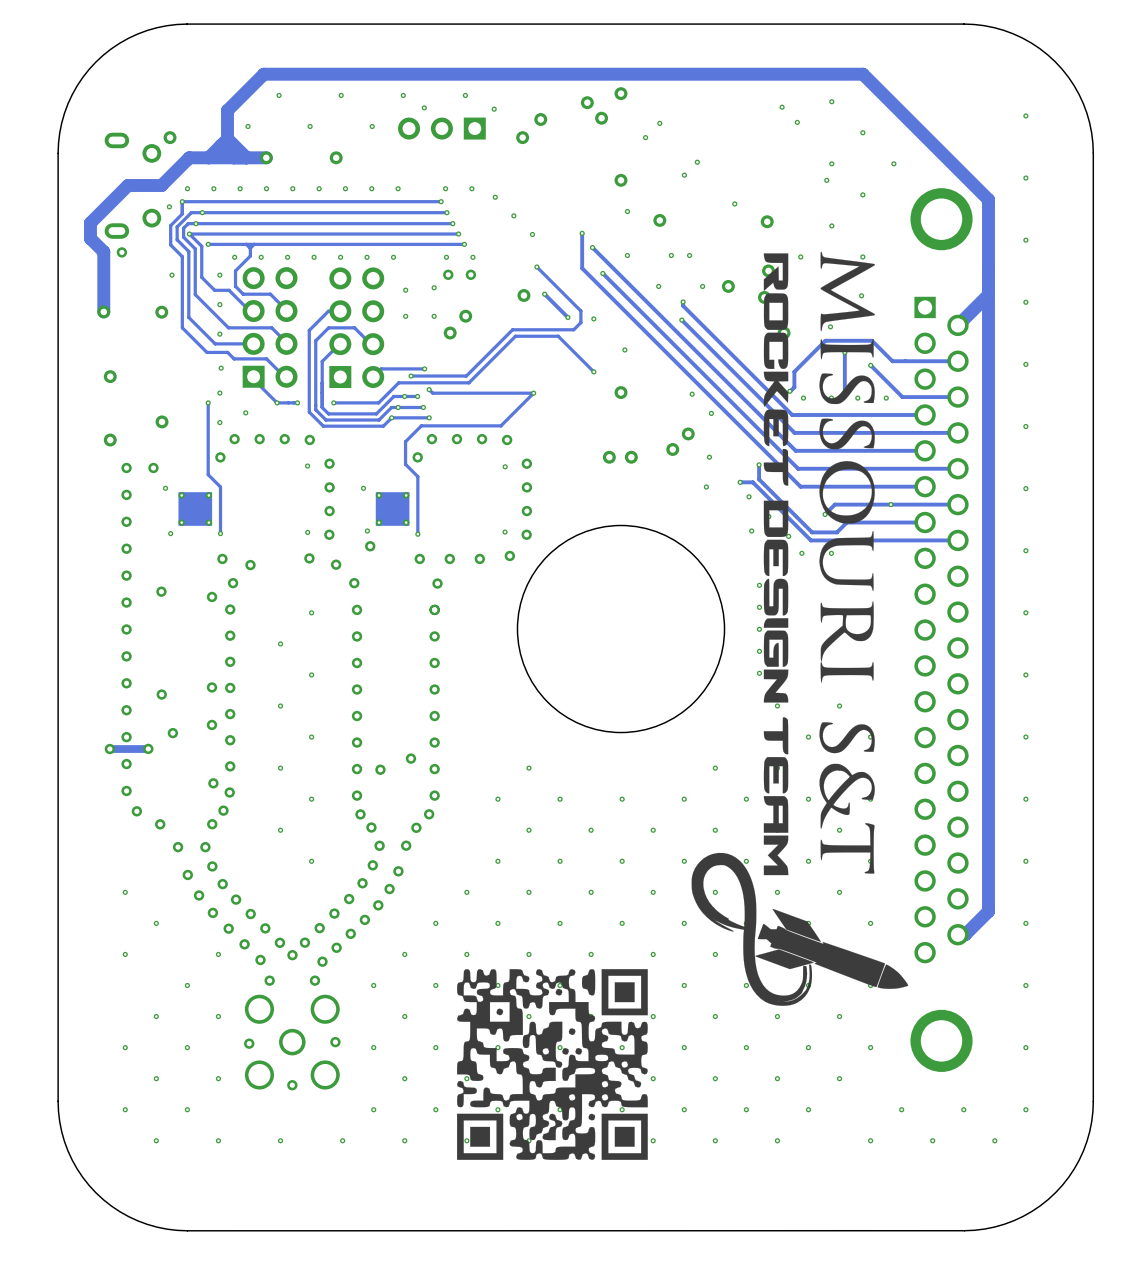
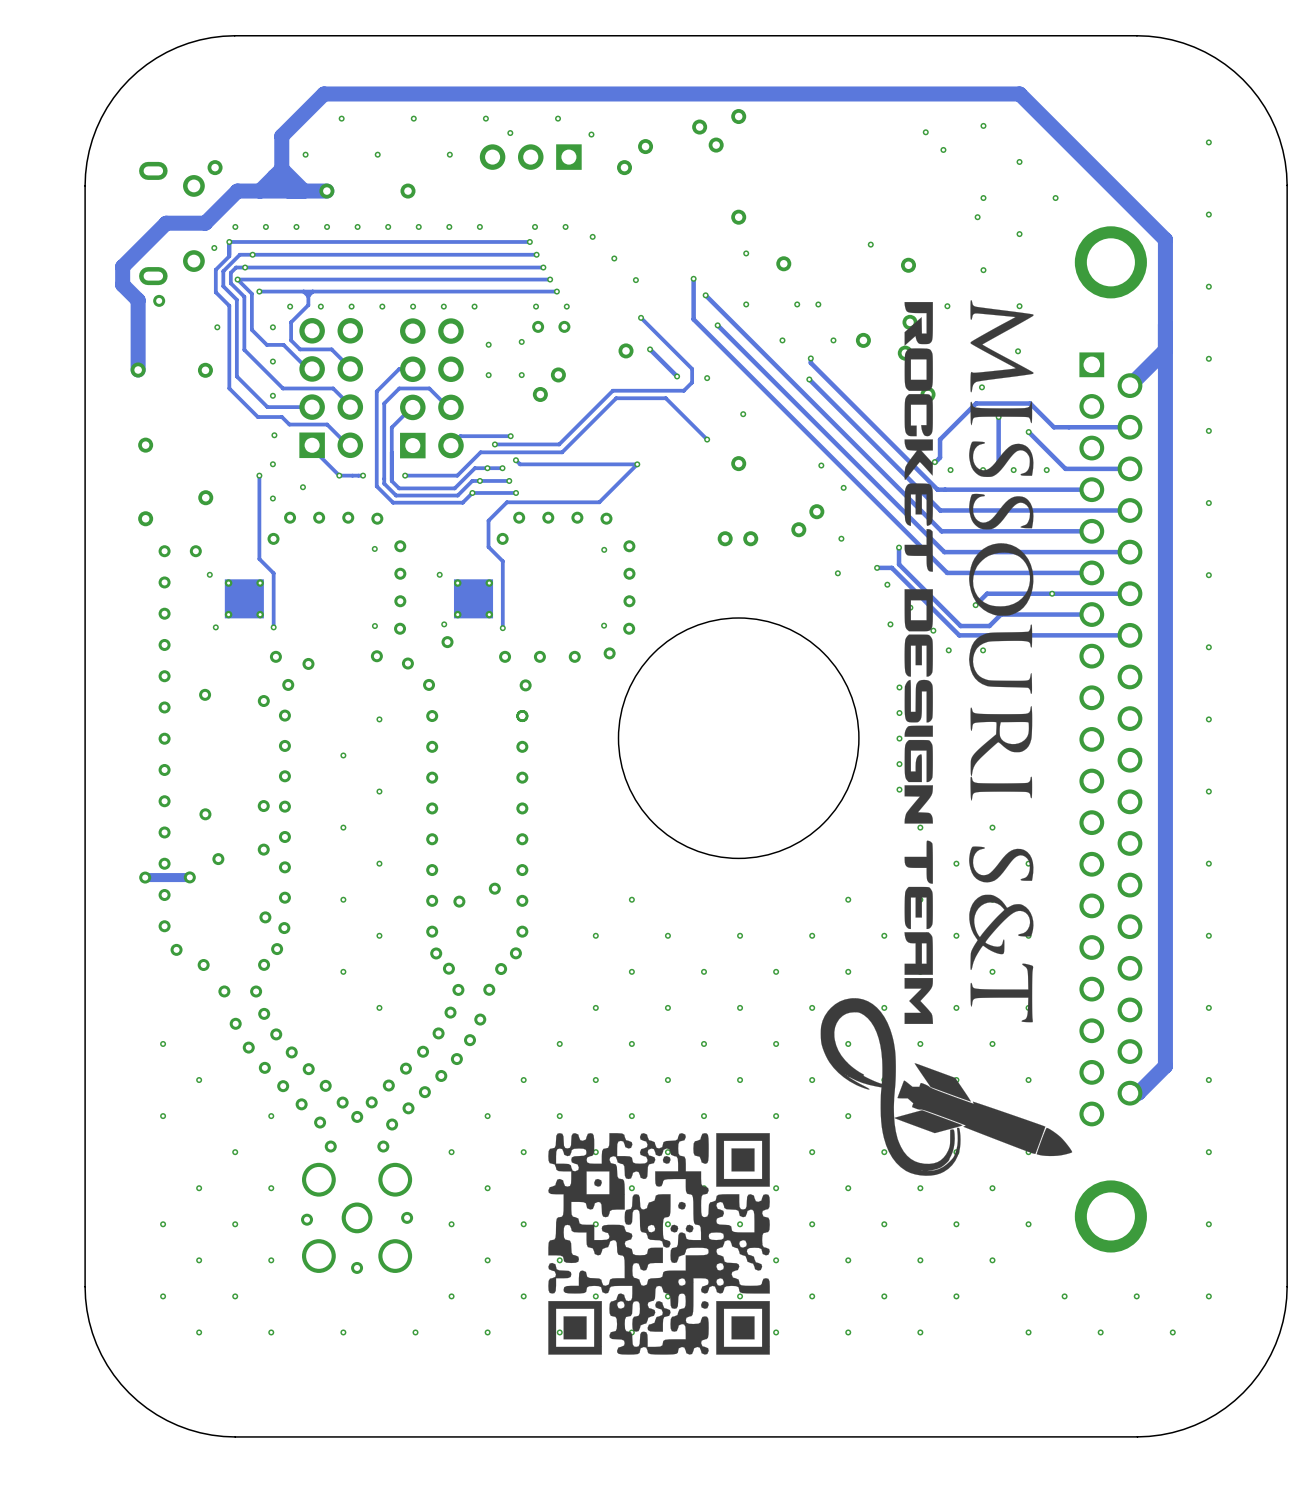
via: (659, 123) -> none
via: (645, 137) -> none
via: (697, 162) -> none
via: (684, 175) -> none

